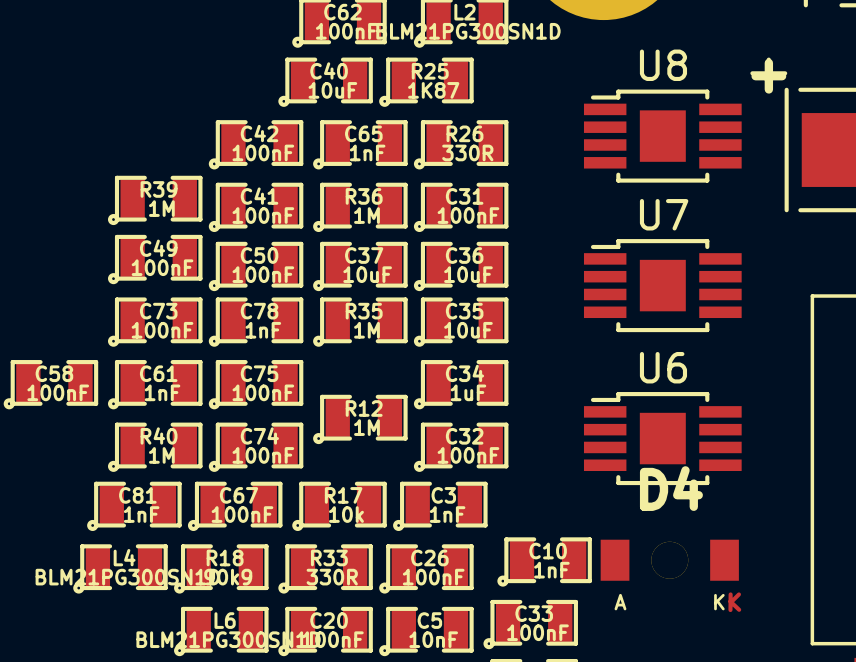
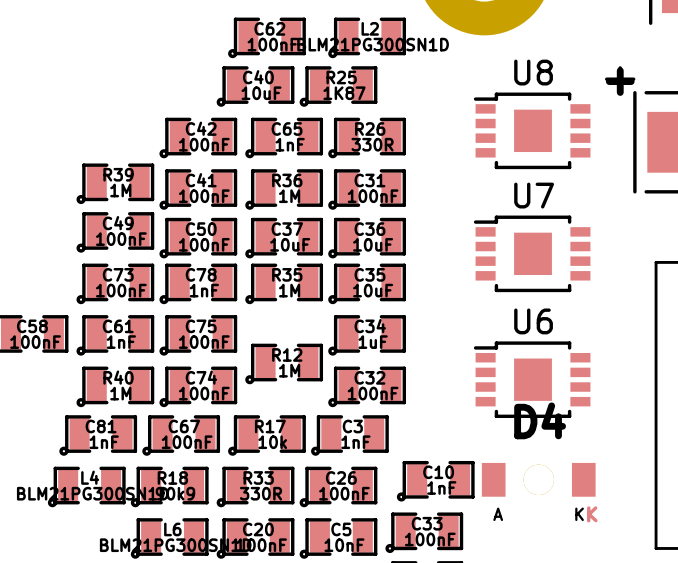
U8 footprint: [583, 89, 742, 183] -> [473, 92, 591, 170]
U7 footprint: [583, 239, 742, 333] -> [473, 215, 591, 293]
U6 footprint: [583, 392, 742, 486] -> [473, 341, 591, 418]

